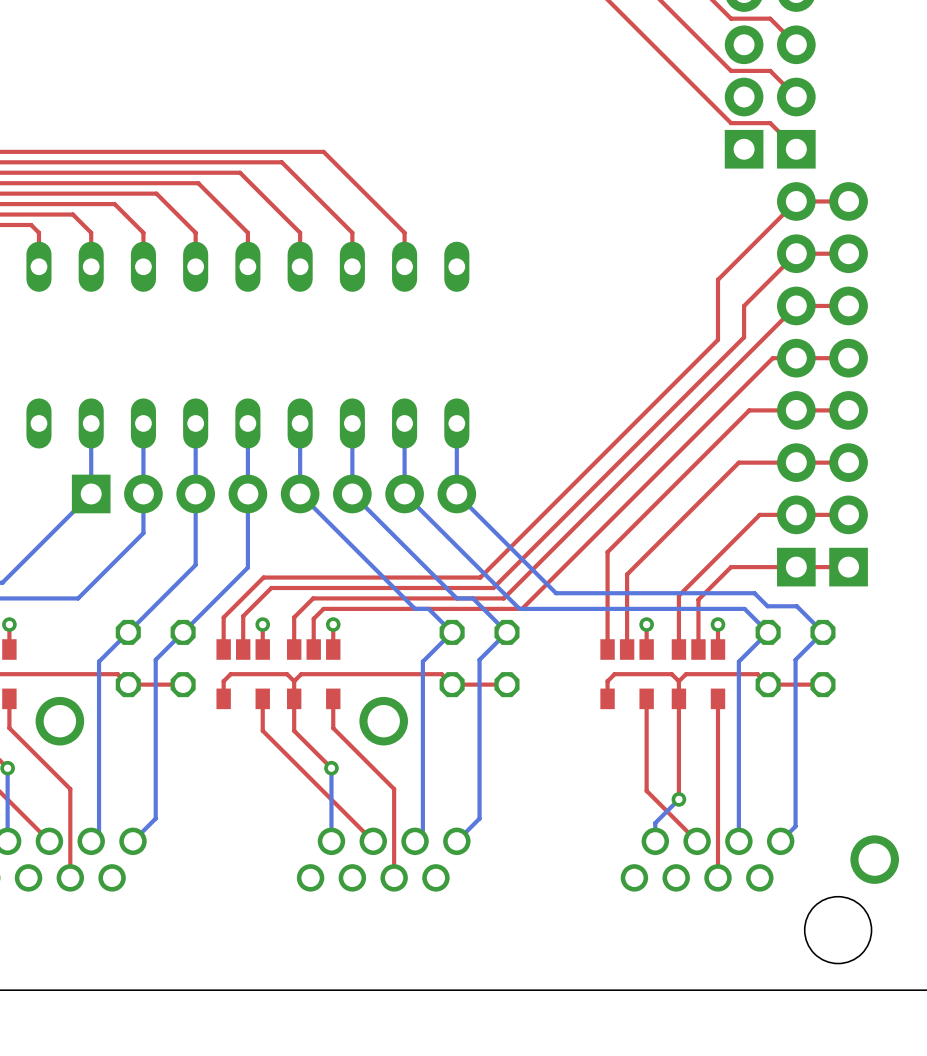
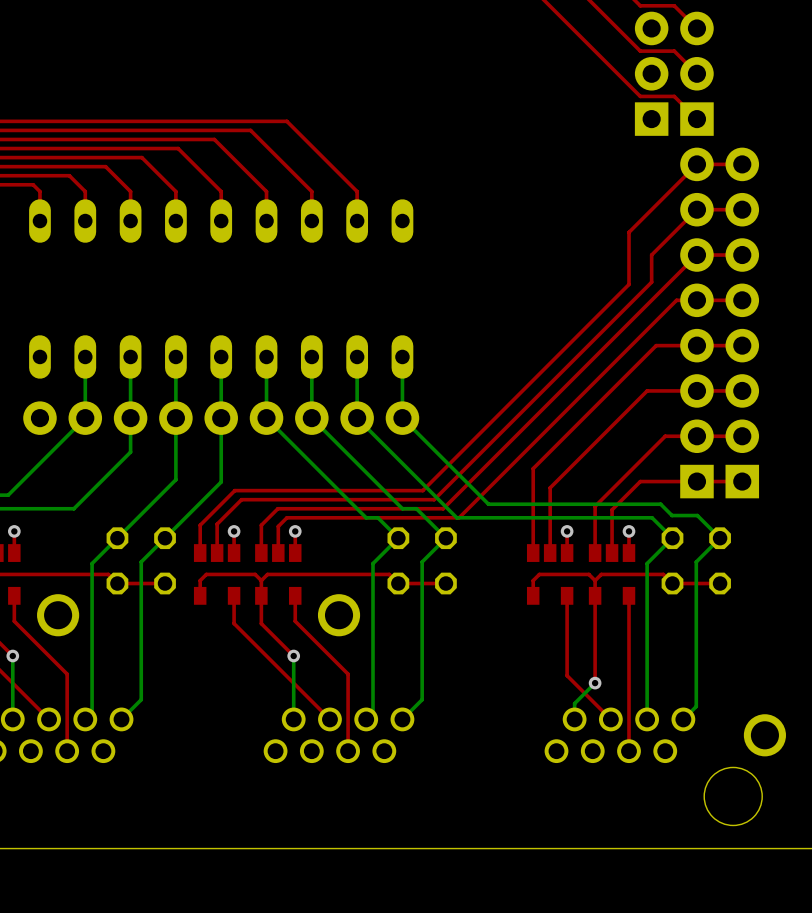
part: none -> (221, 418)
part: (274, 493) -> none

